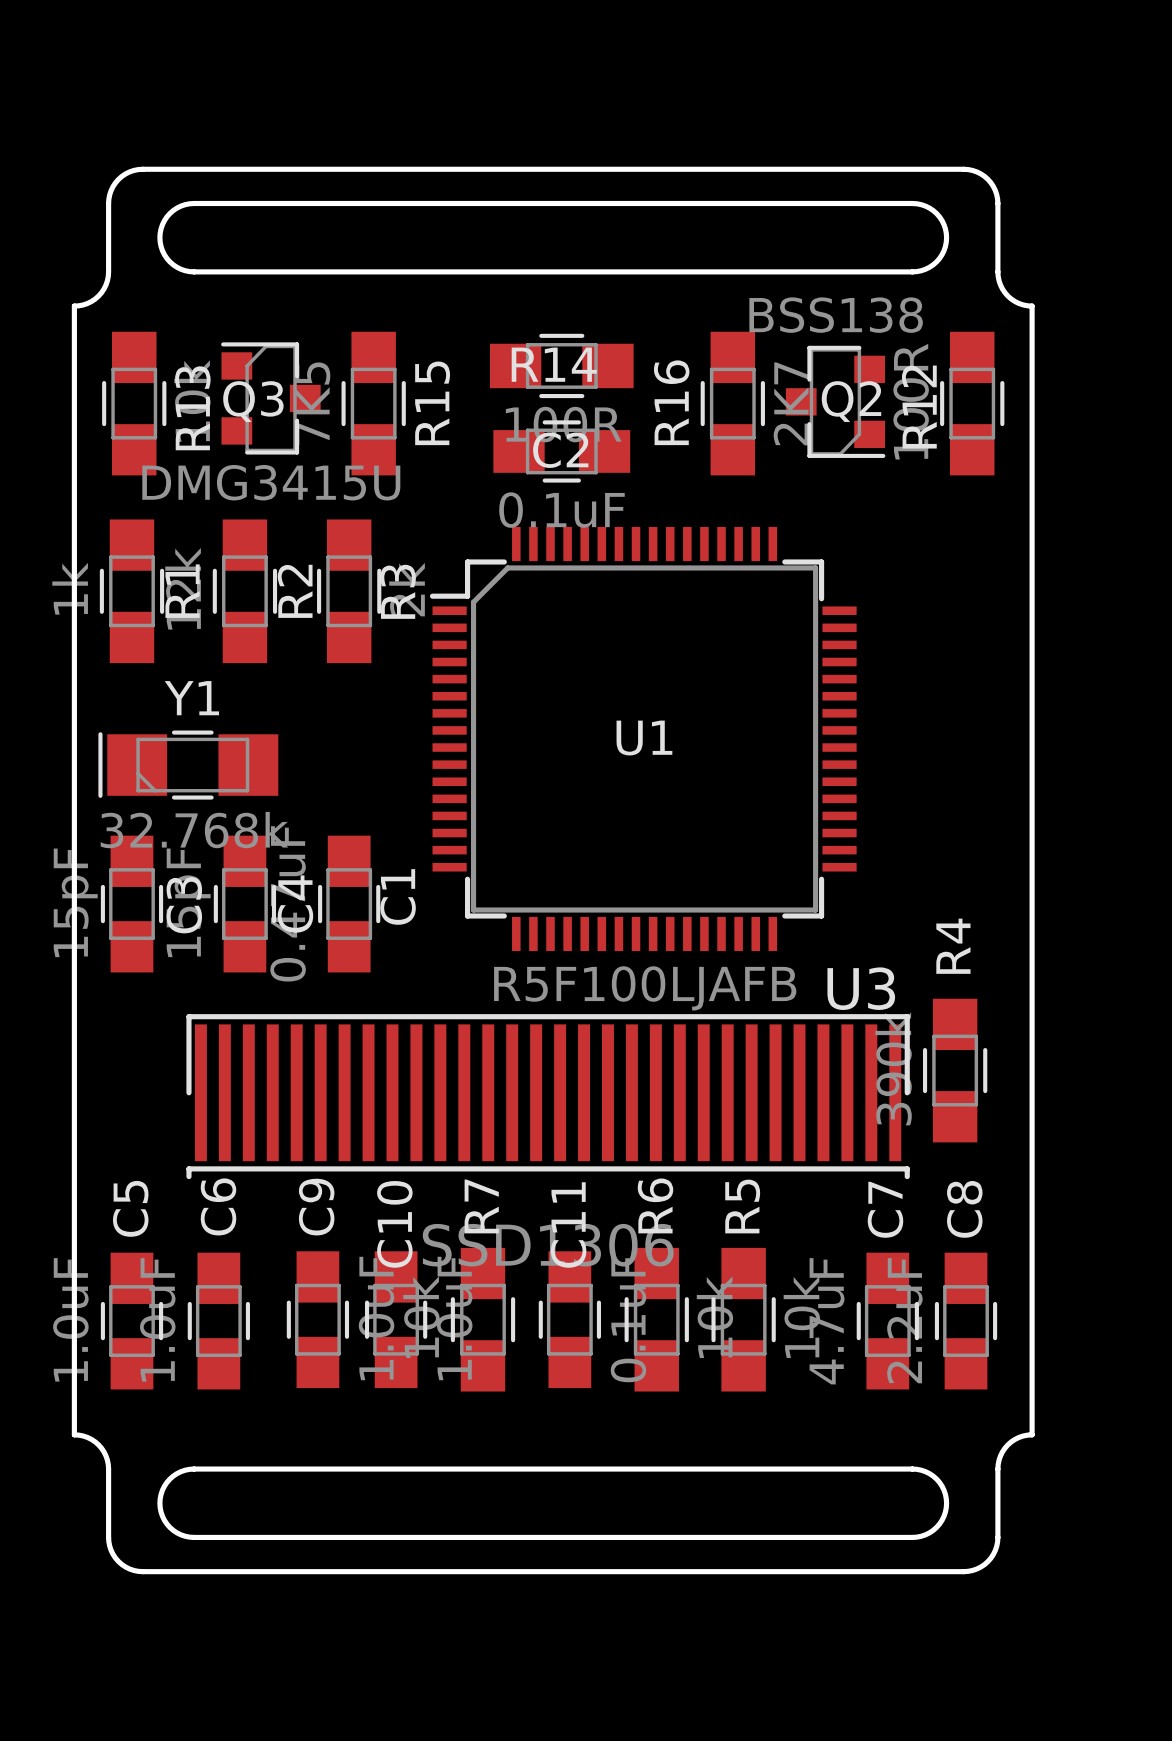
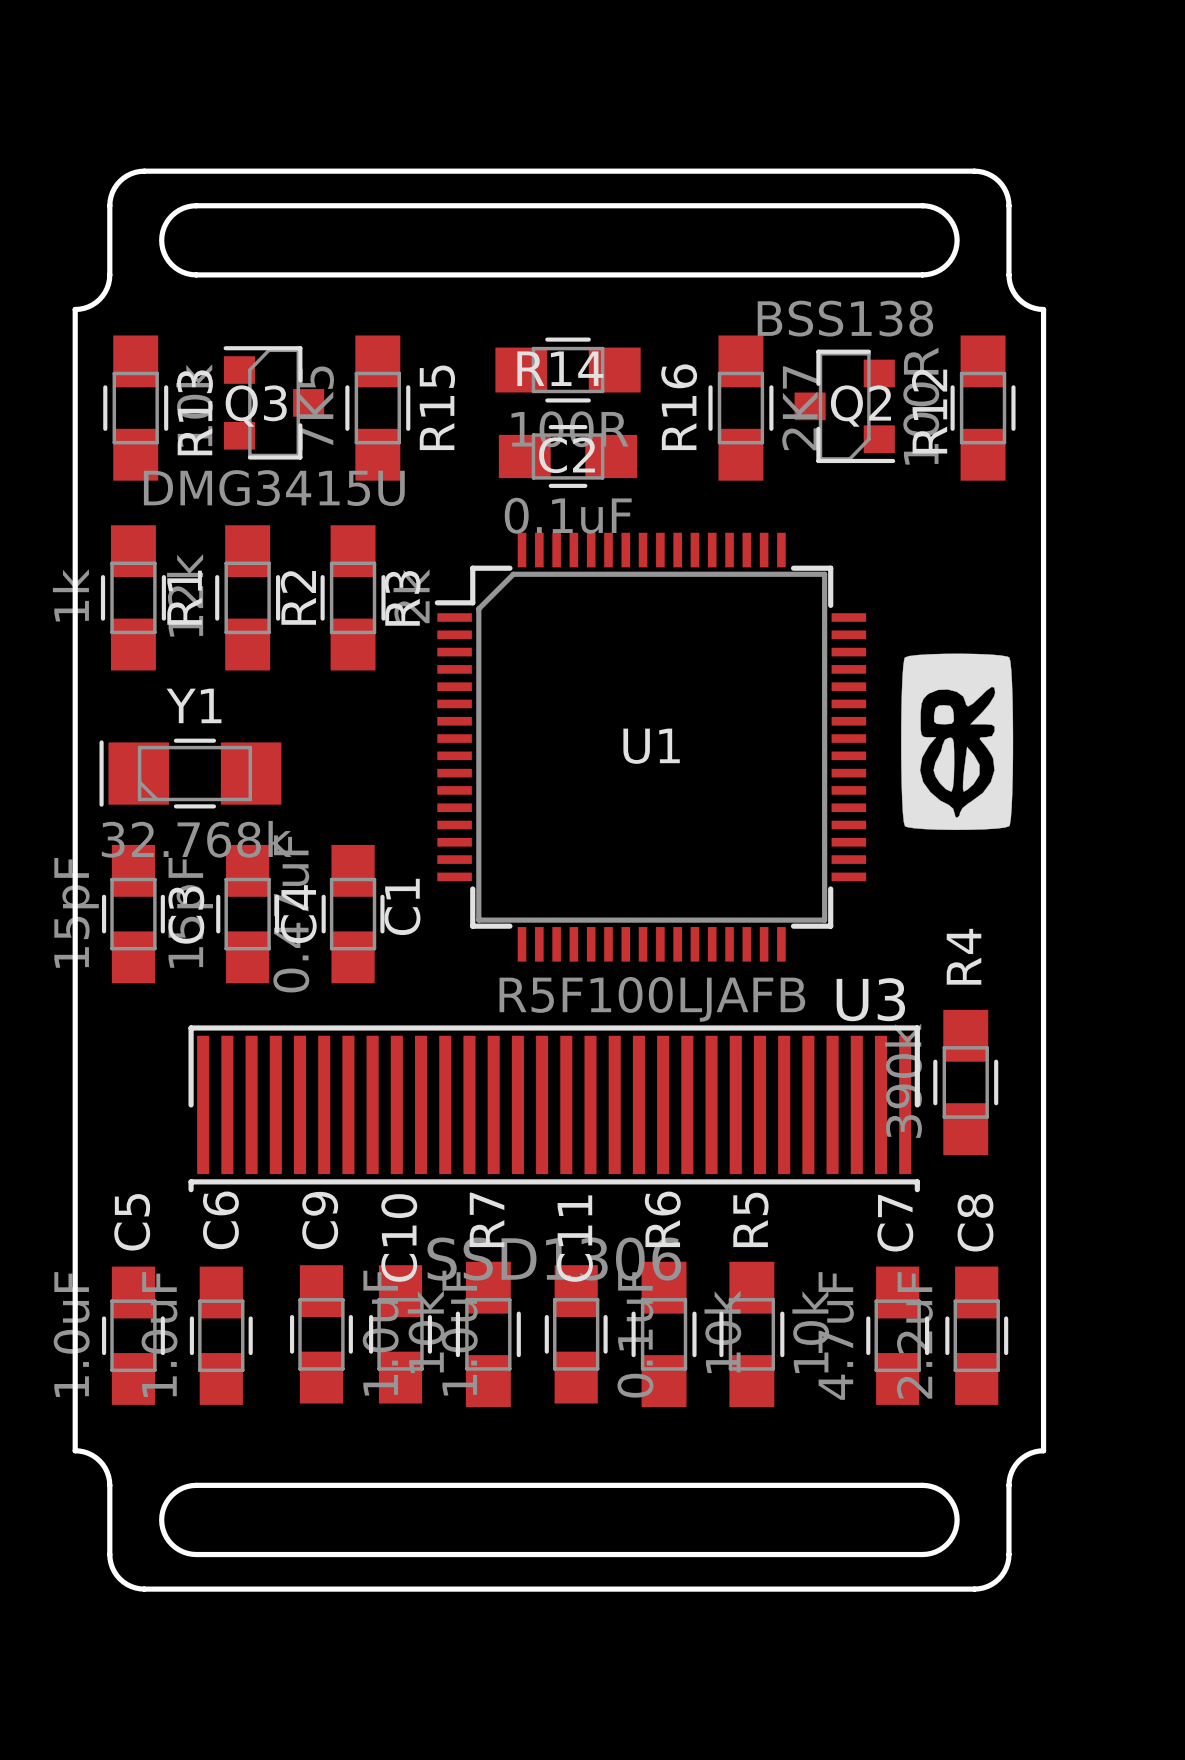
drawing: none -> [901, 653, 1014, 830]

